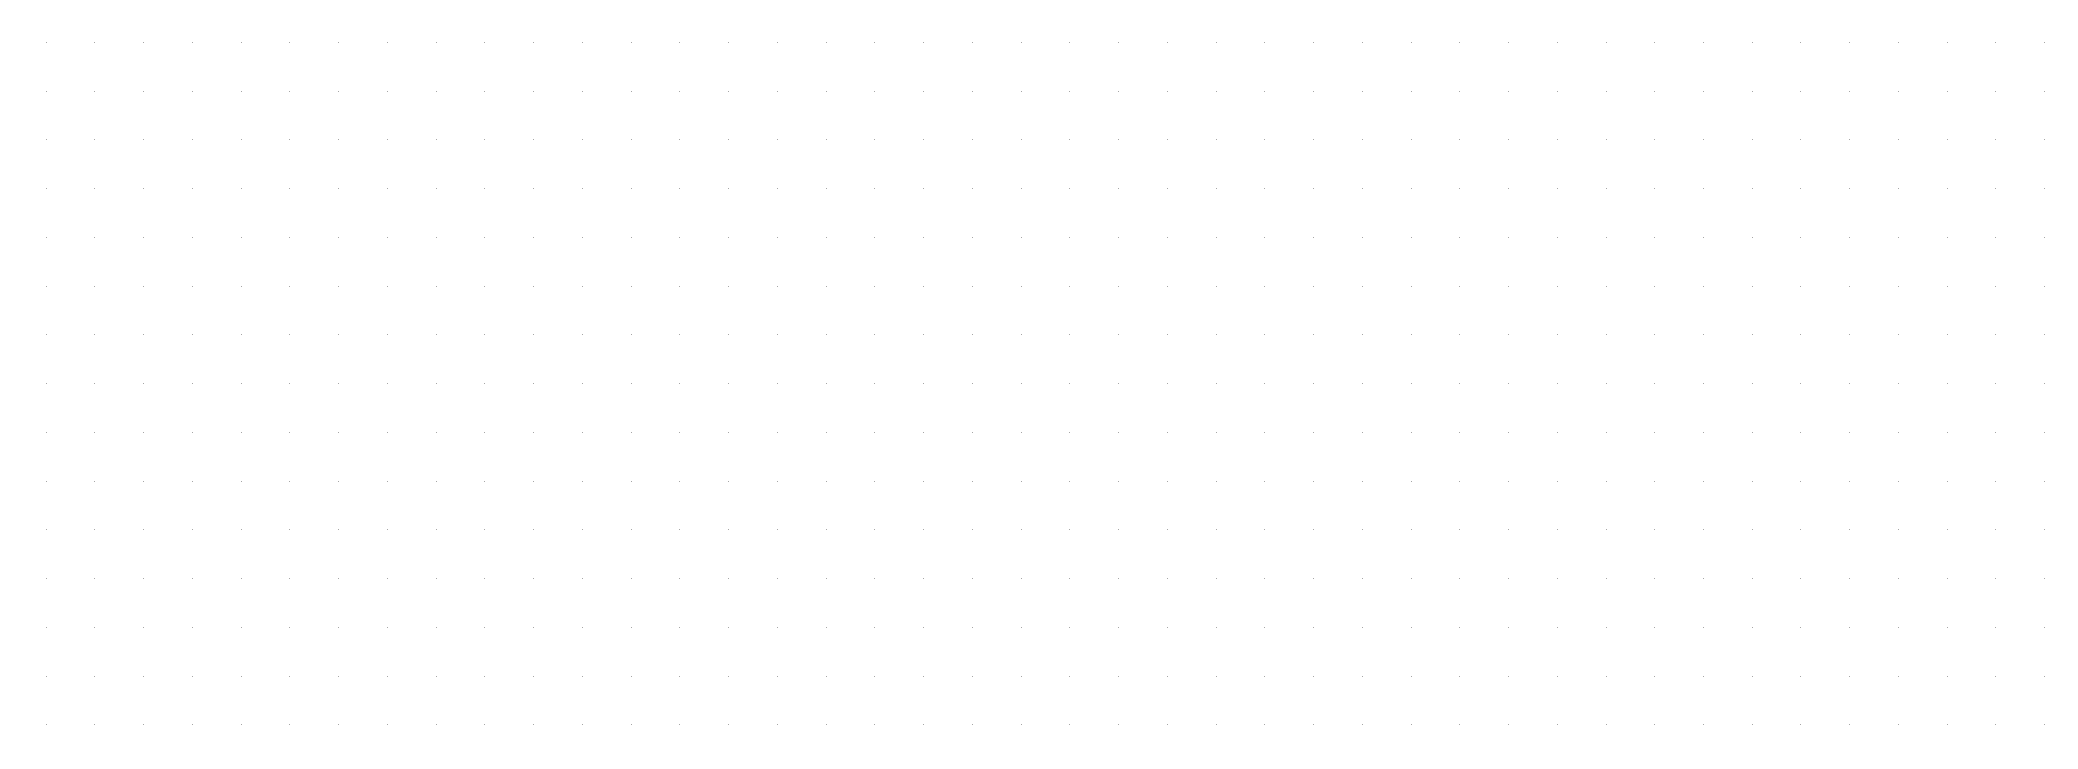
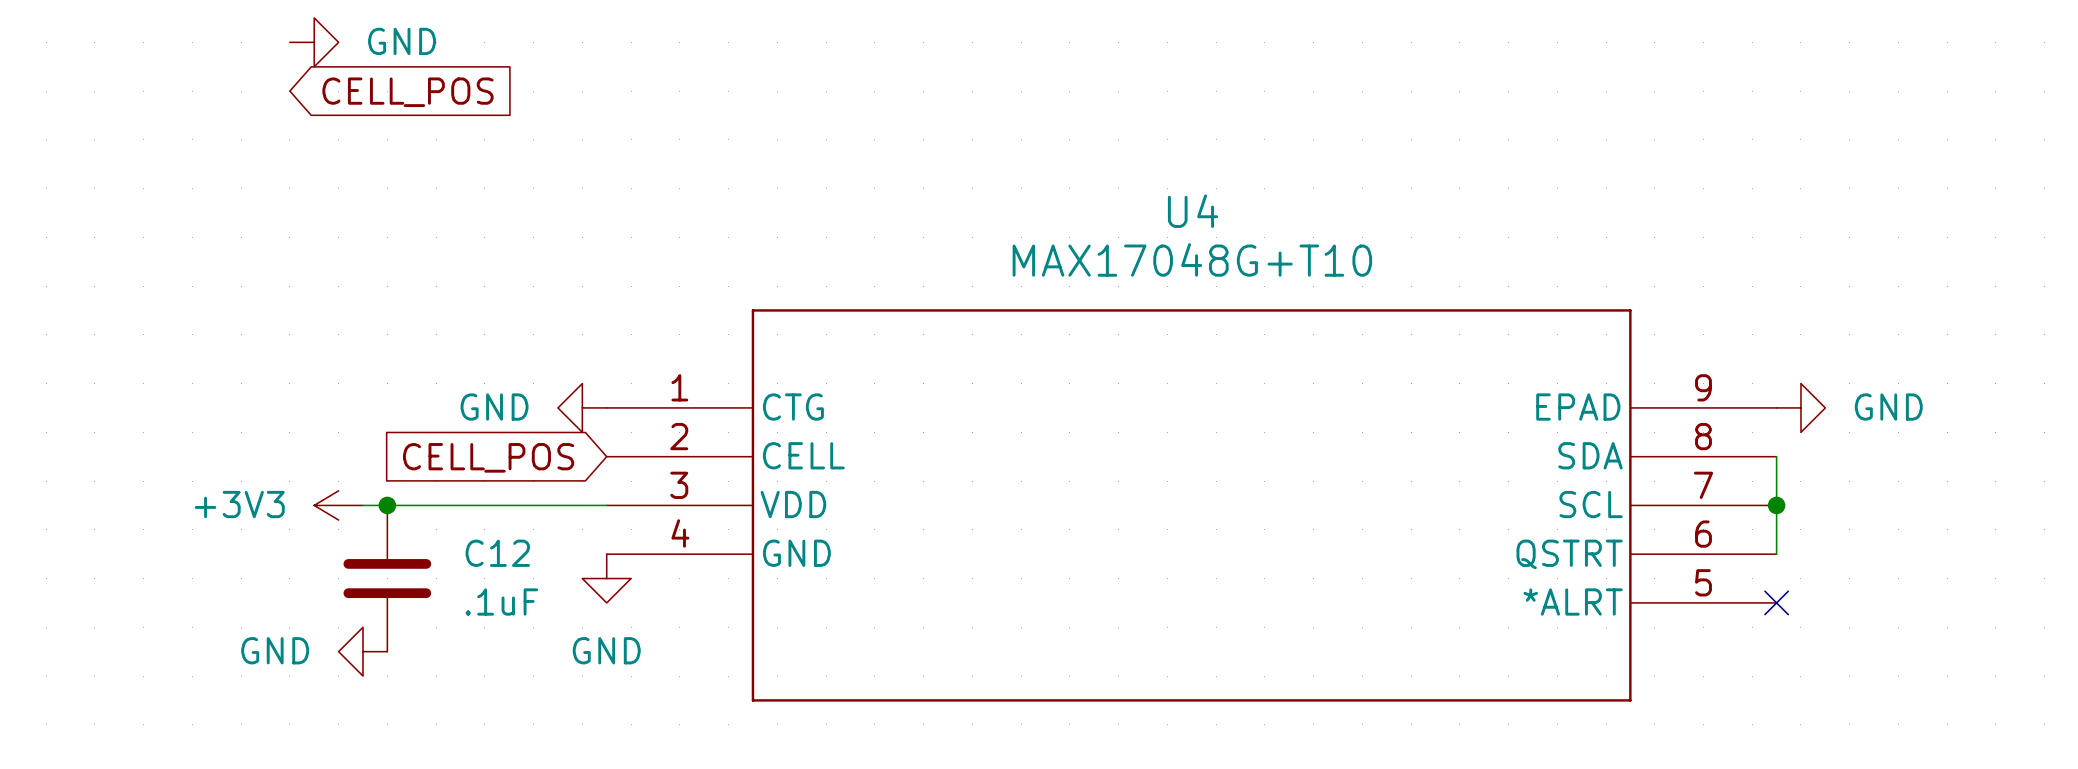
power symbol: none -> GND (314, 42)
global label: none -> CELL_POS (408, 92)
power symbol: none -> GND (582, 407)
power symbol: none -> GND (1800, 407)
wire: none -> (1776, 456) (1776, 554)
global label: none -> CELL_POS (488, 457)
power symbol: none -> +3V3 (338, 505)
wire: none -> (362, 505) (606, 505)
junction: none -> (387, 505)
U4: none -> MAX17048G+T10 (1191, 505)
junction: none -> (1776, 505)
C12: none -> .1uF (387, 578)
power symbol: none -> GND (606, 578)
no-connect mark: none -> (1776, 602)
power symbol: none -> GND (362, 651)

